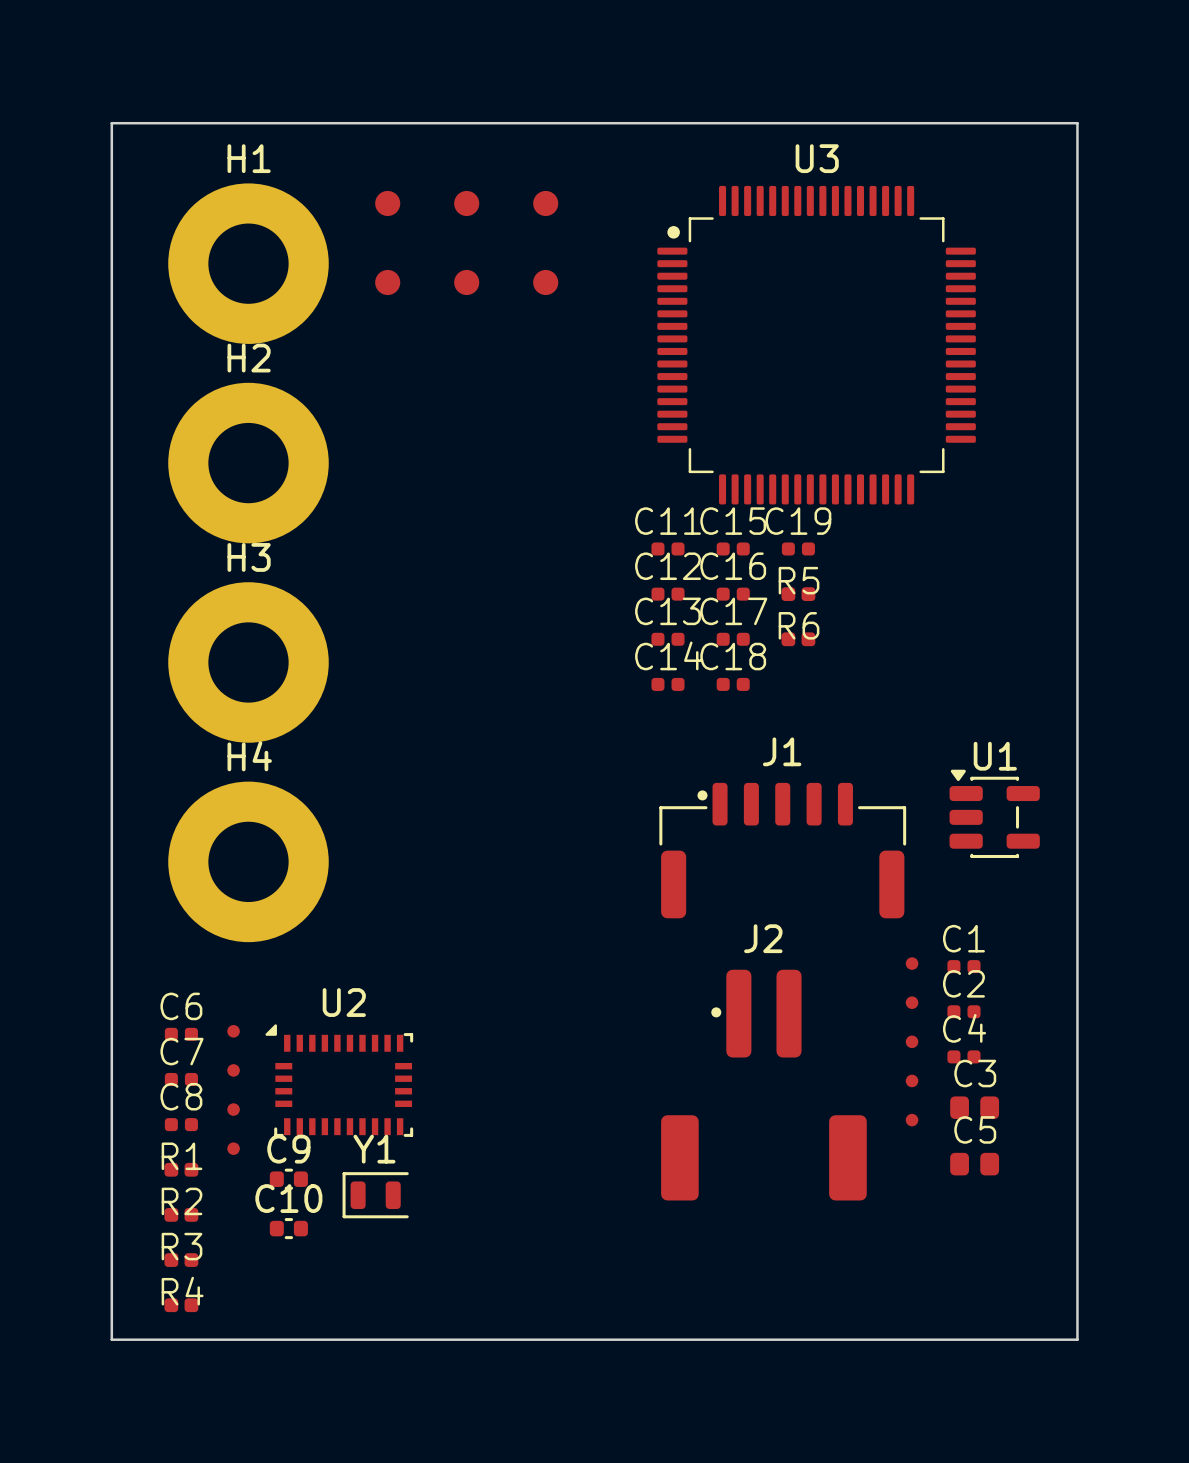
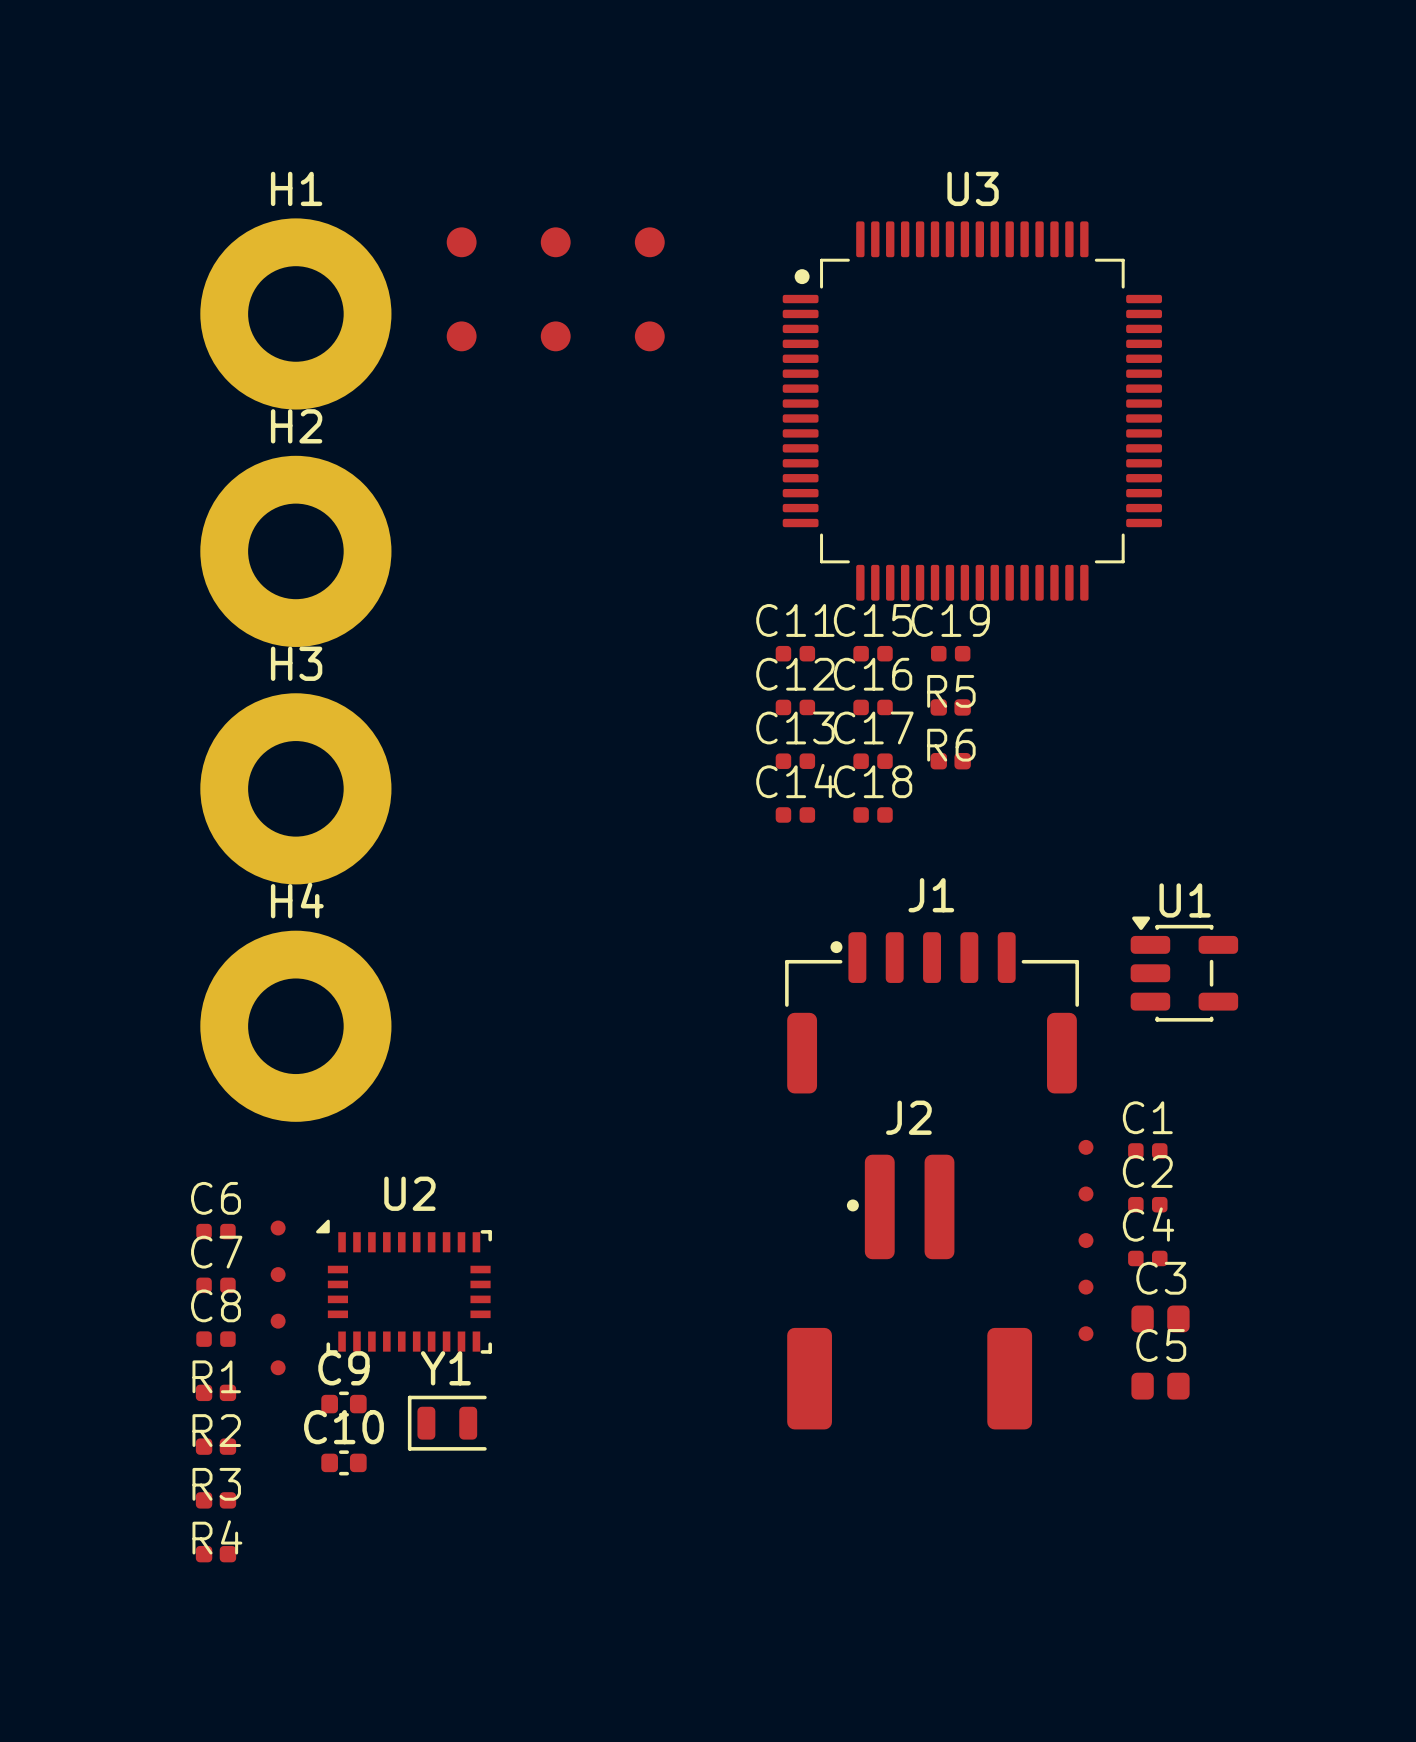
board edge: (111, 123) (1077, 123) (1077, 1339) (111, 1339) (111, 123) -> none

